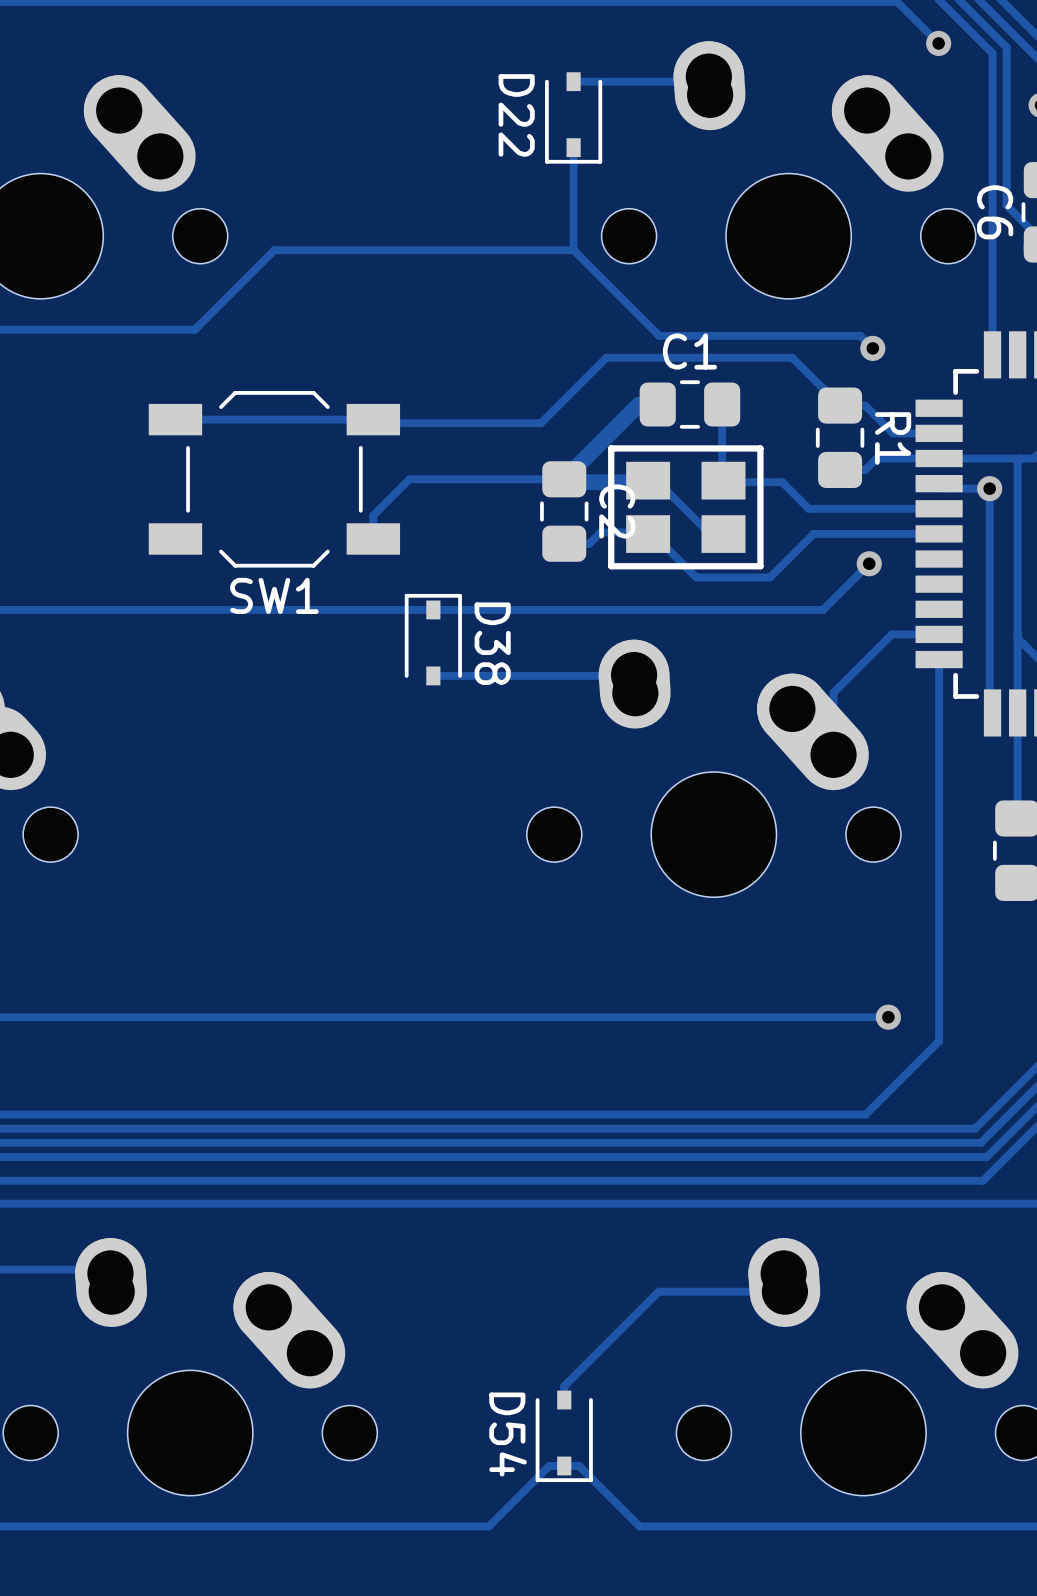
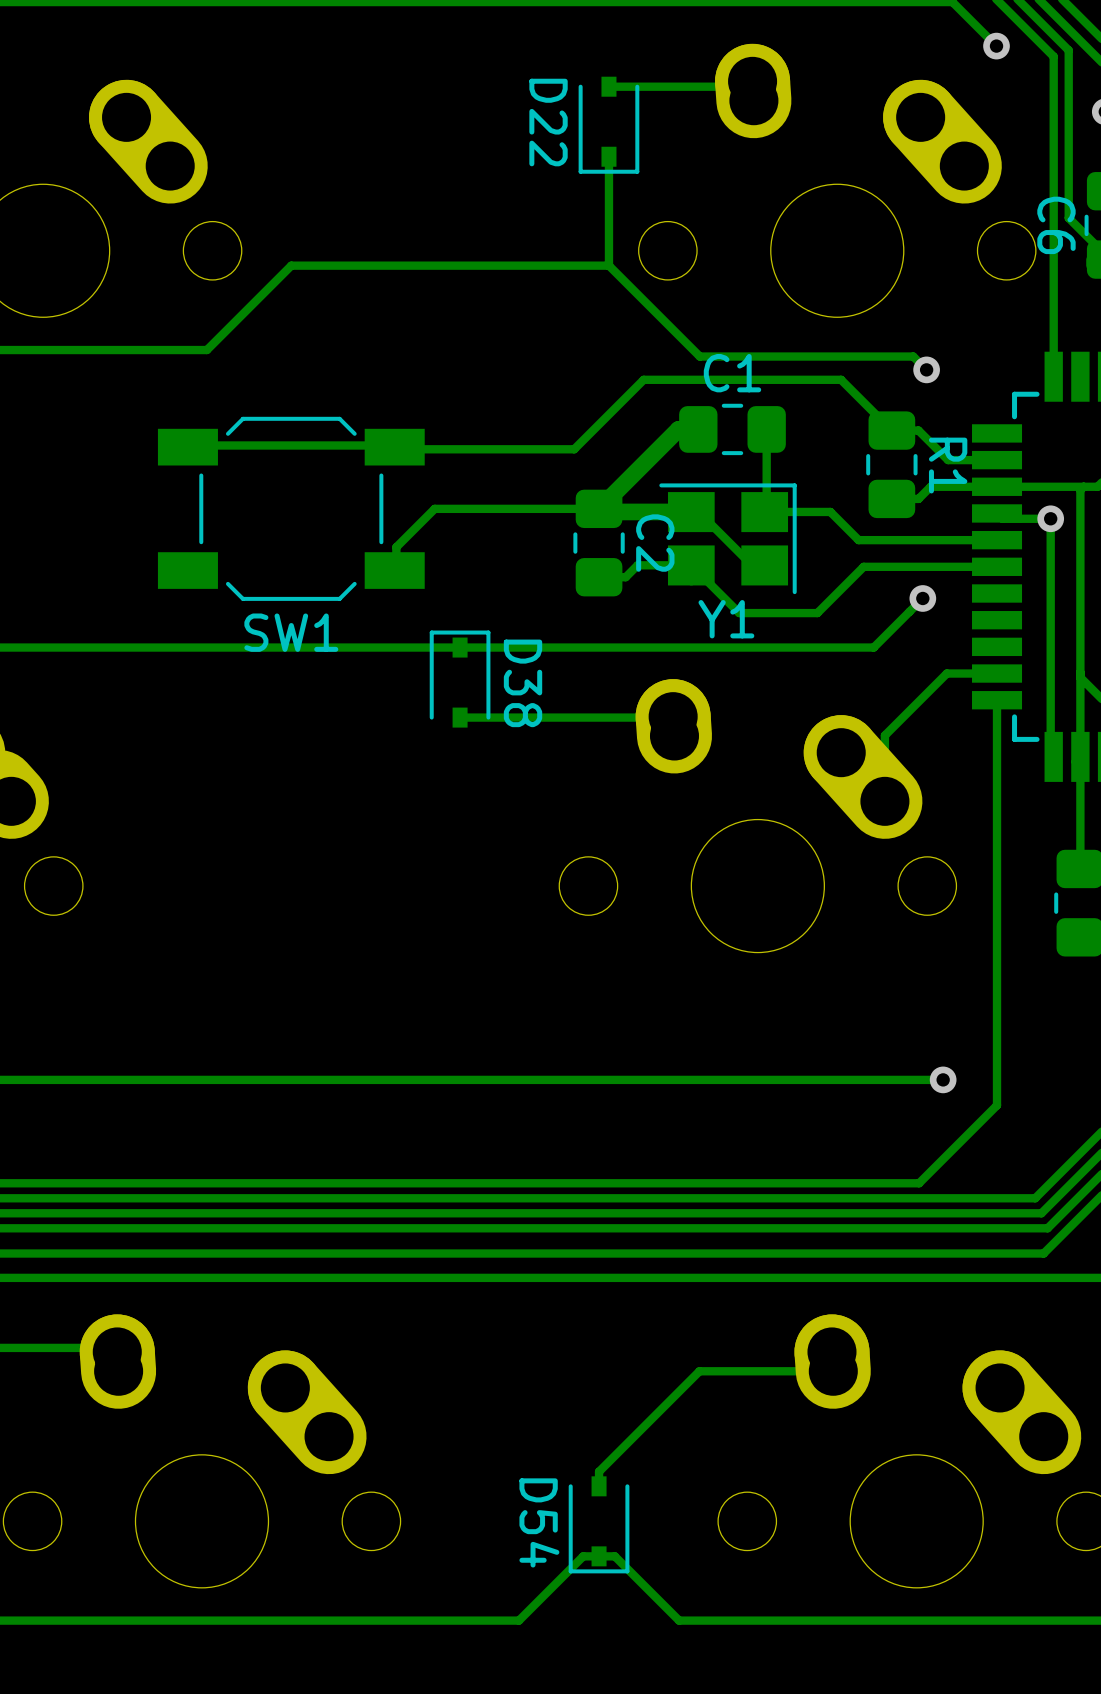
SW1 footprint: [148, 391, 401, 568] -> [157, 416, 425, 601]
part: (685, 507) -> none
Y1: none -> (728, 538)

